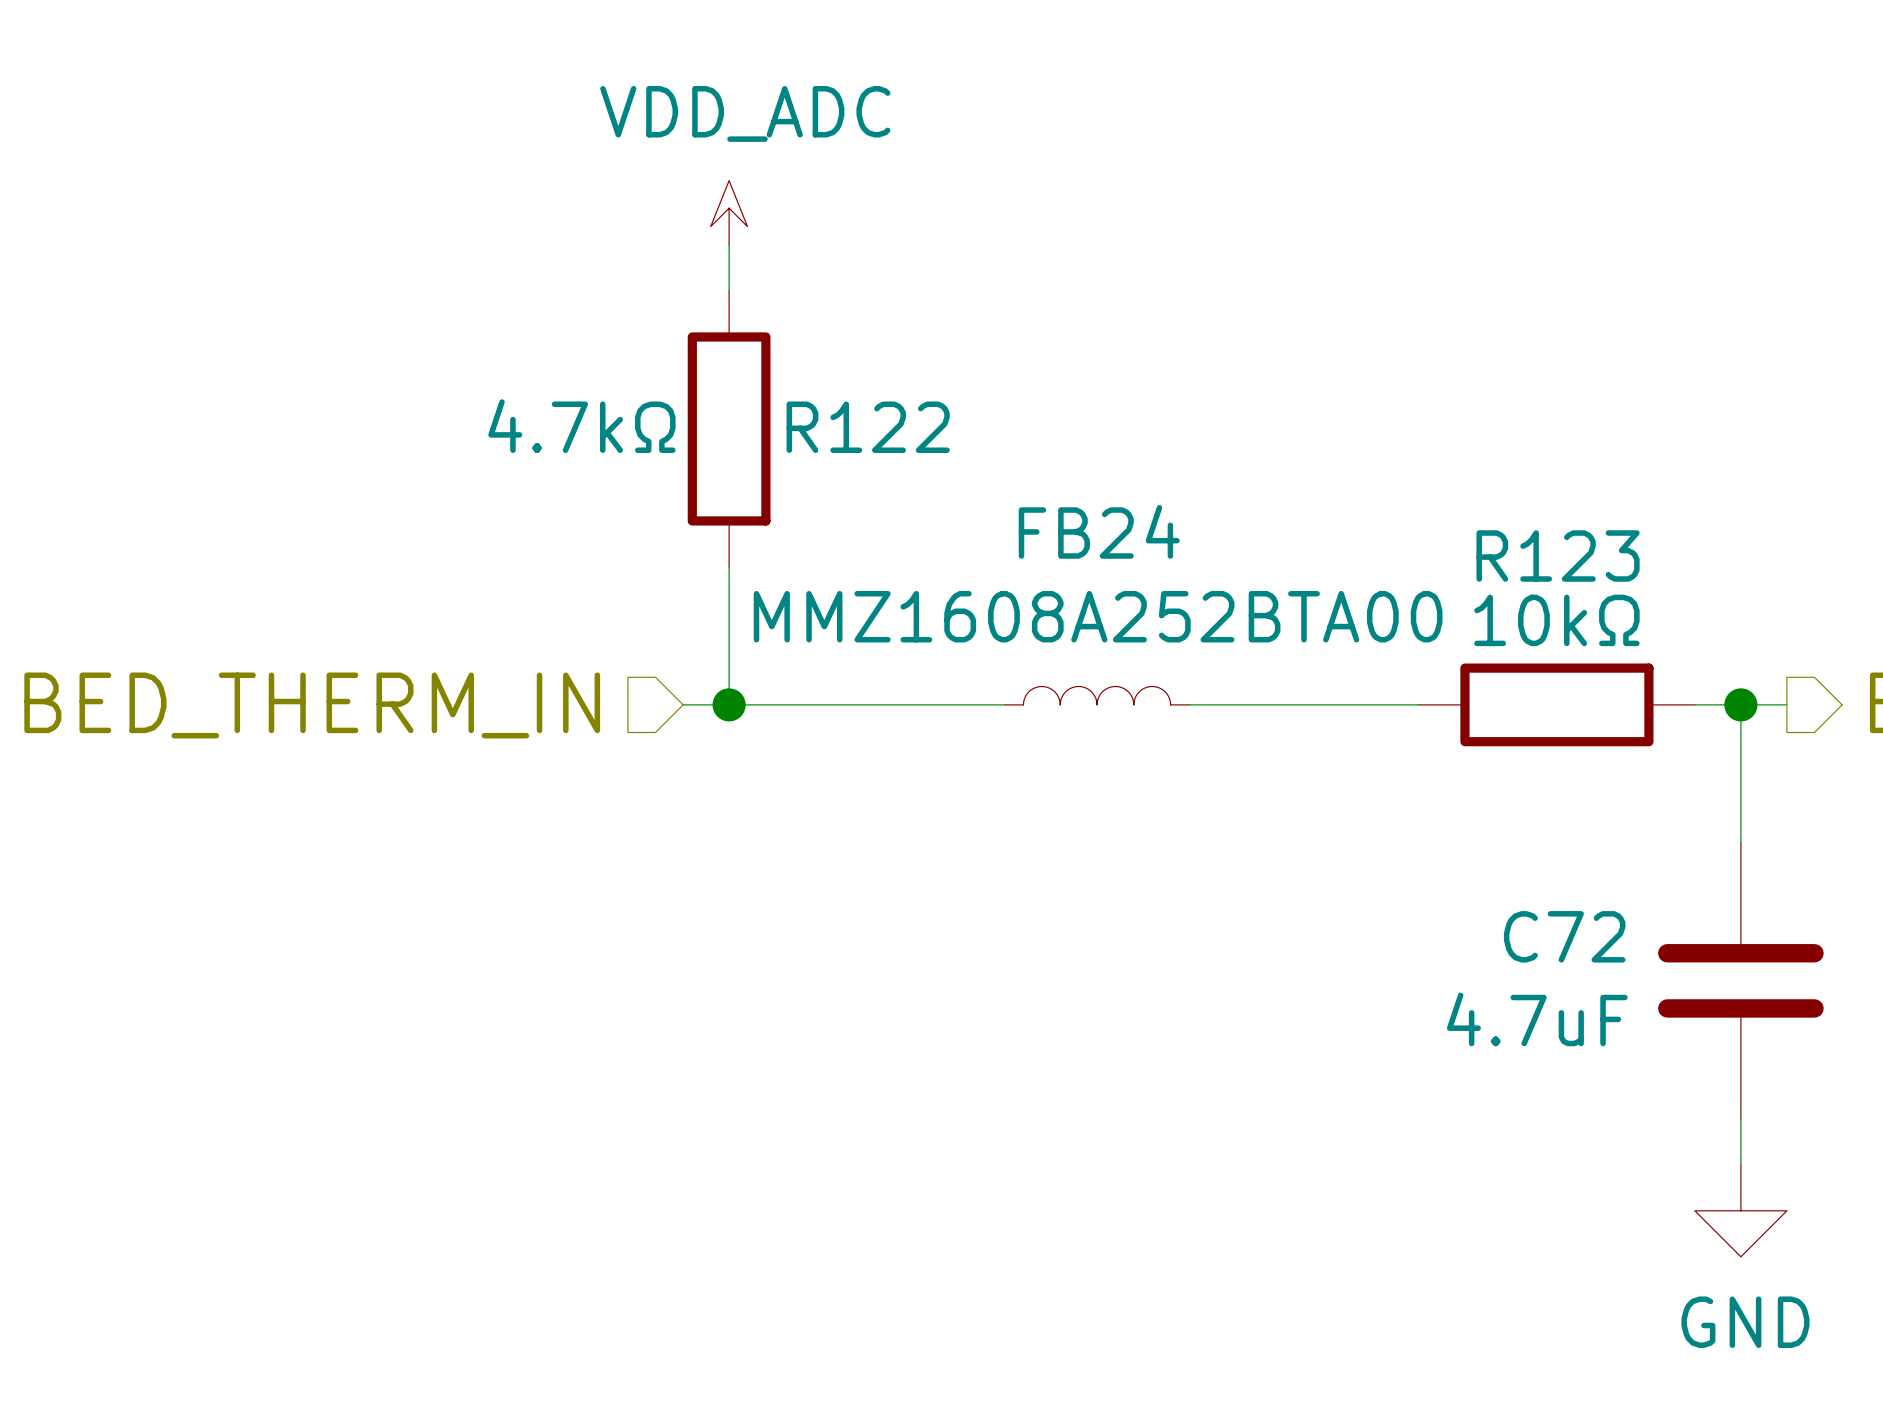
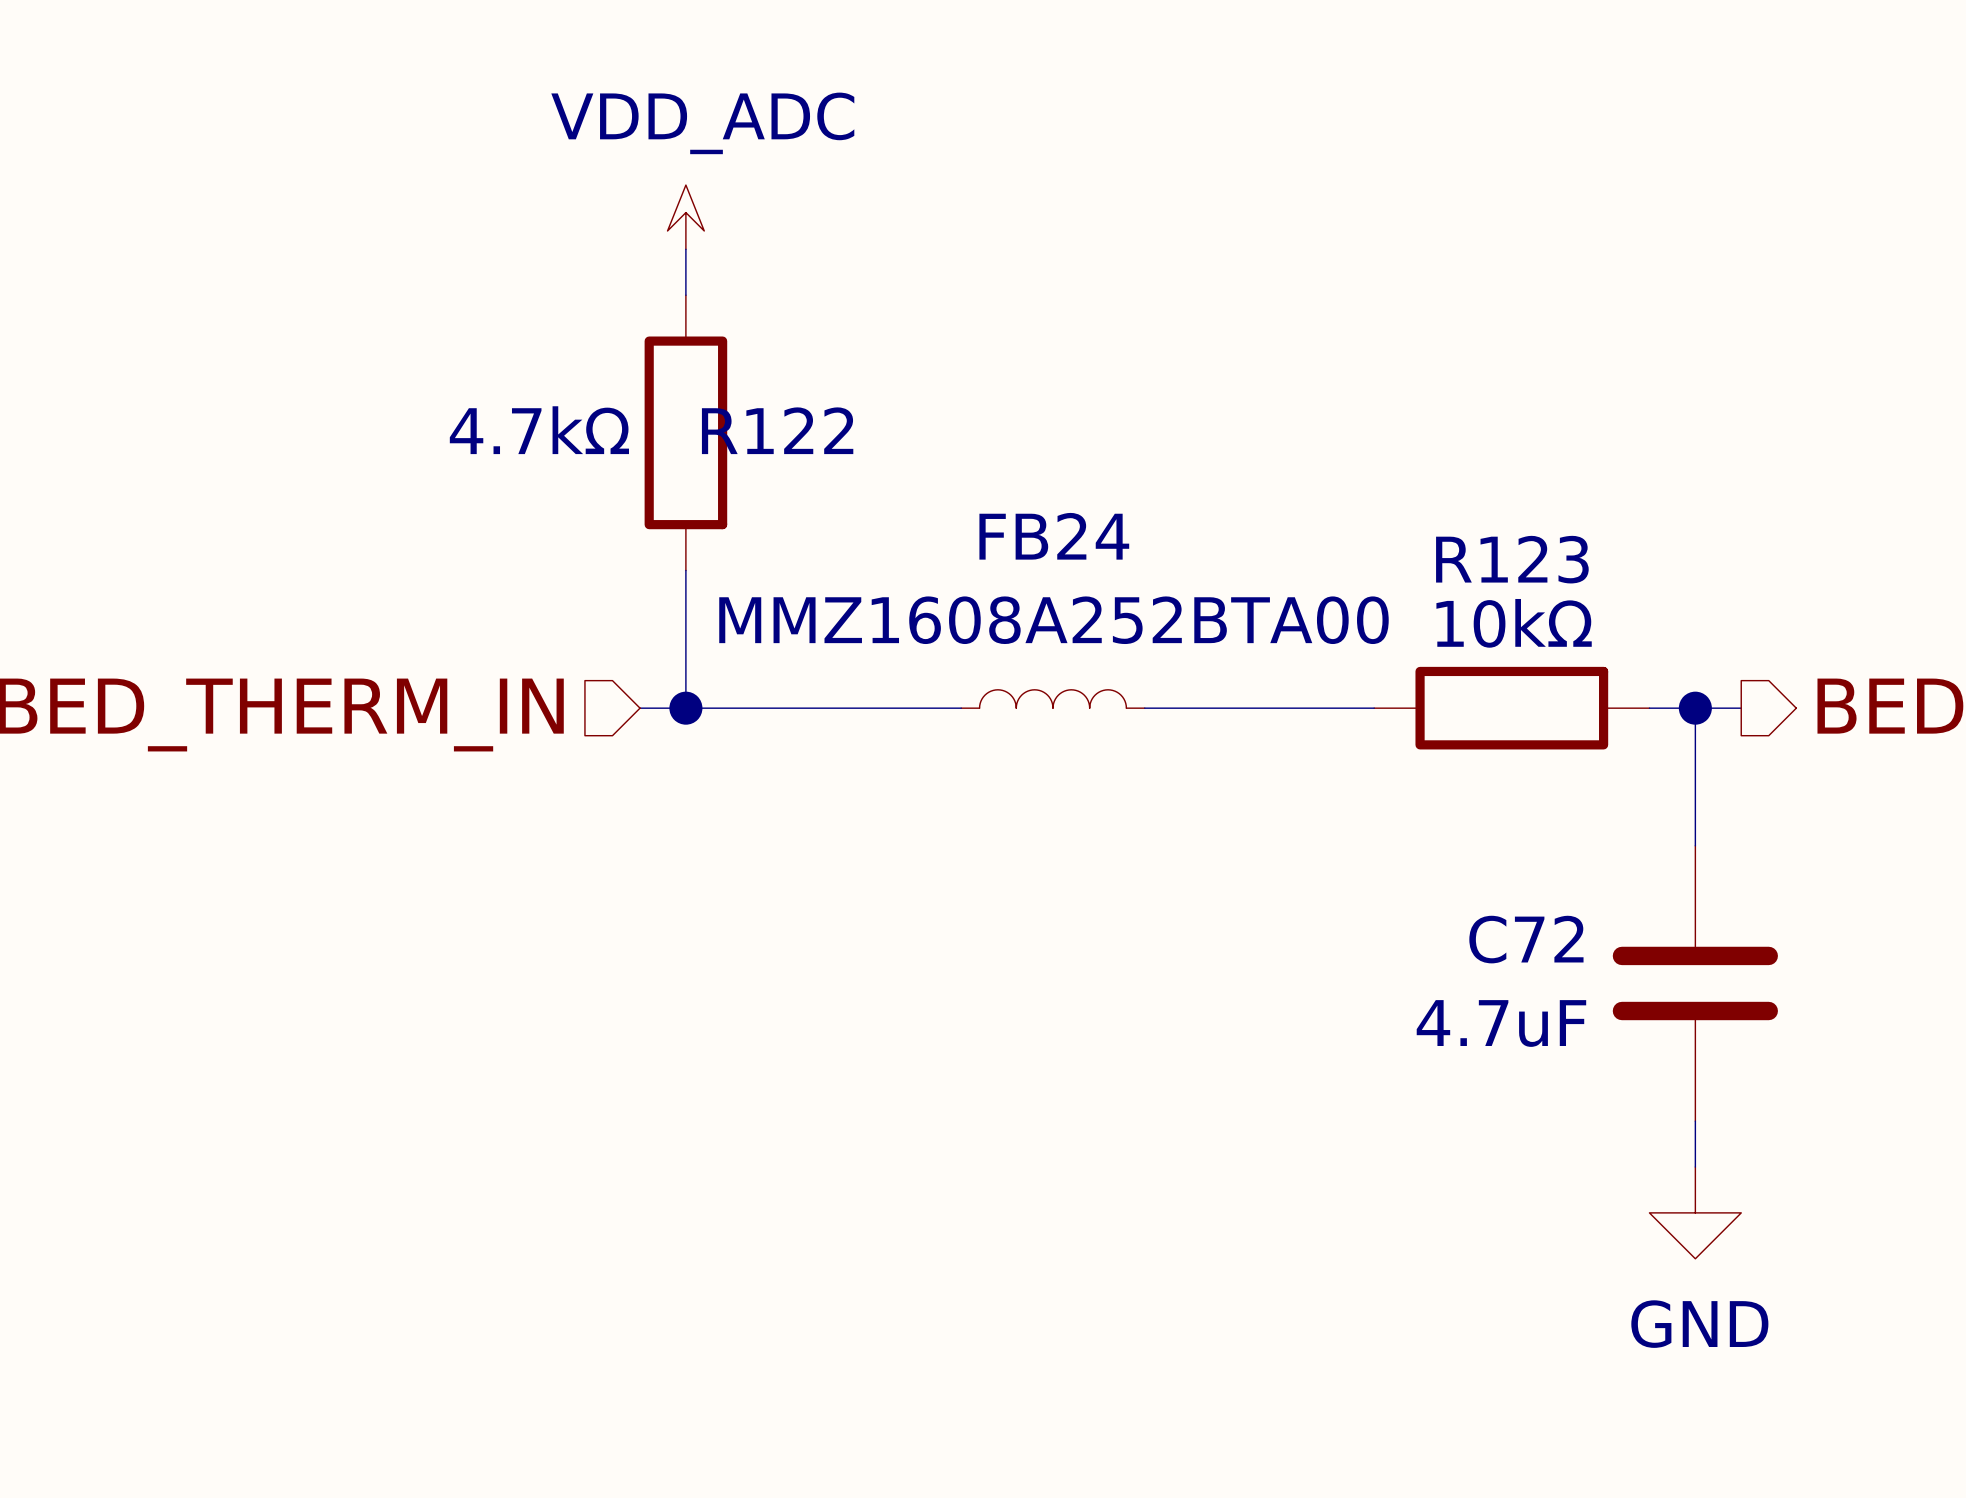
R122 name position: R122 (868, 427) -> R122 (777, 430)

